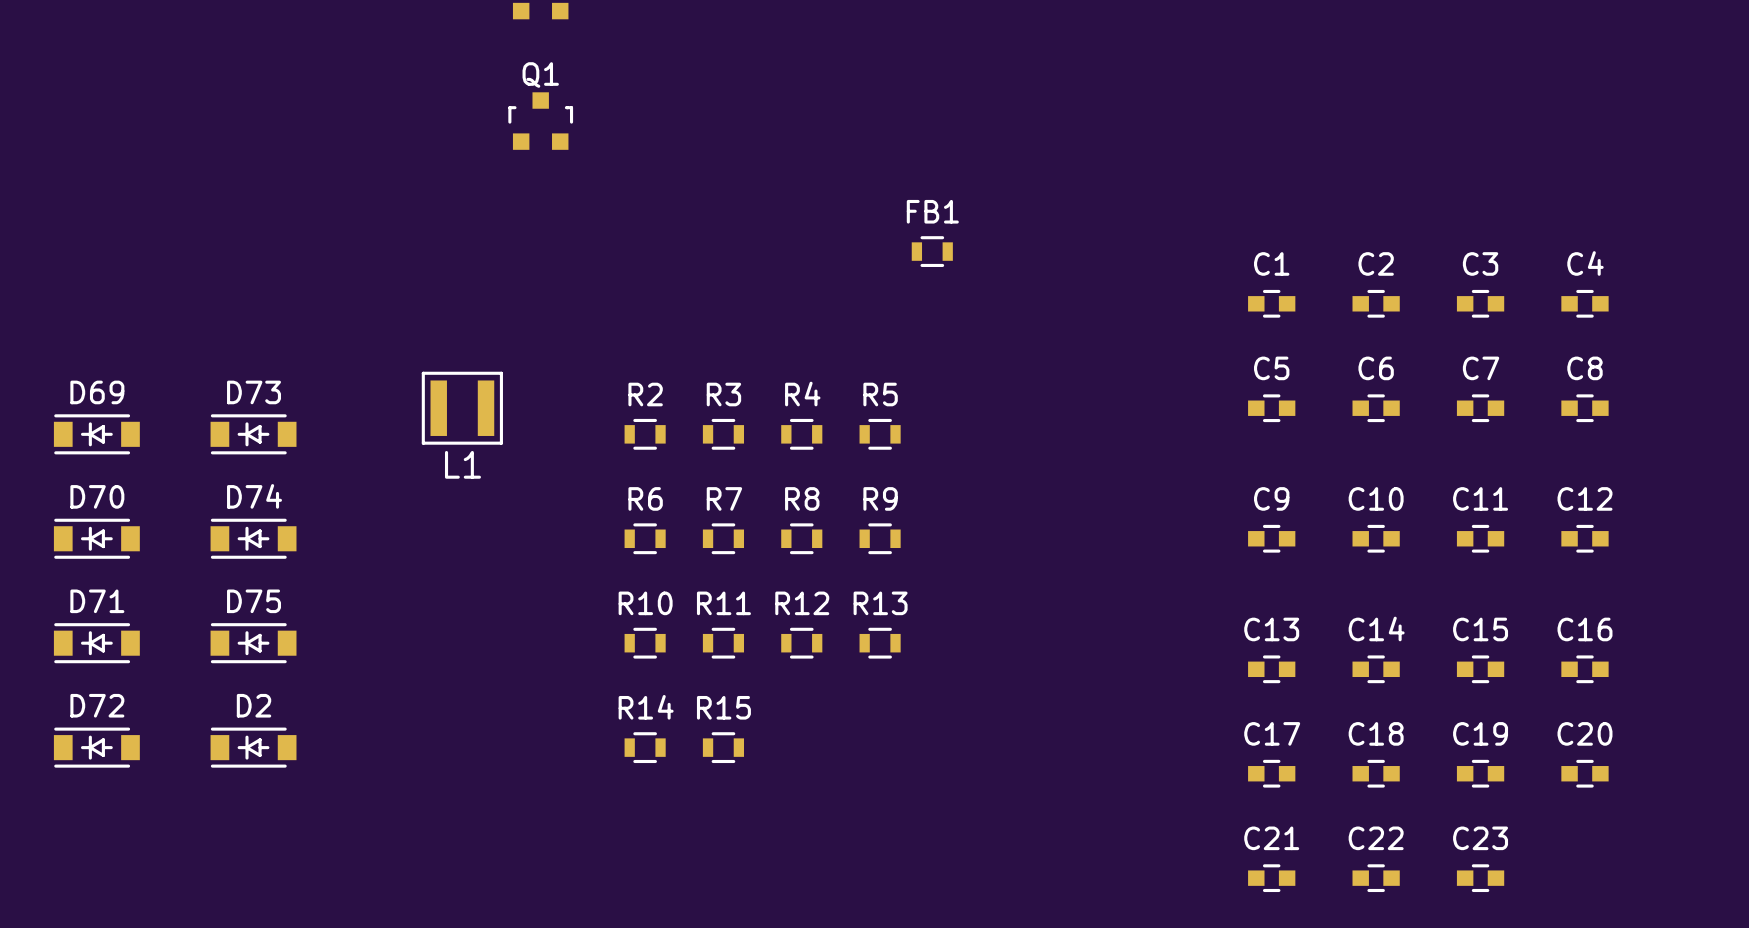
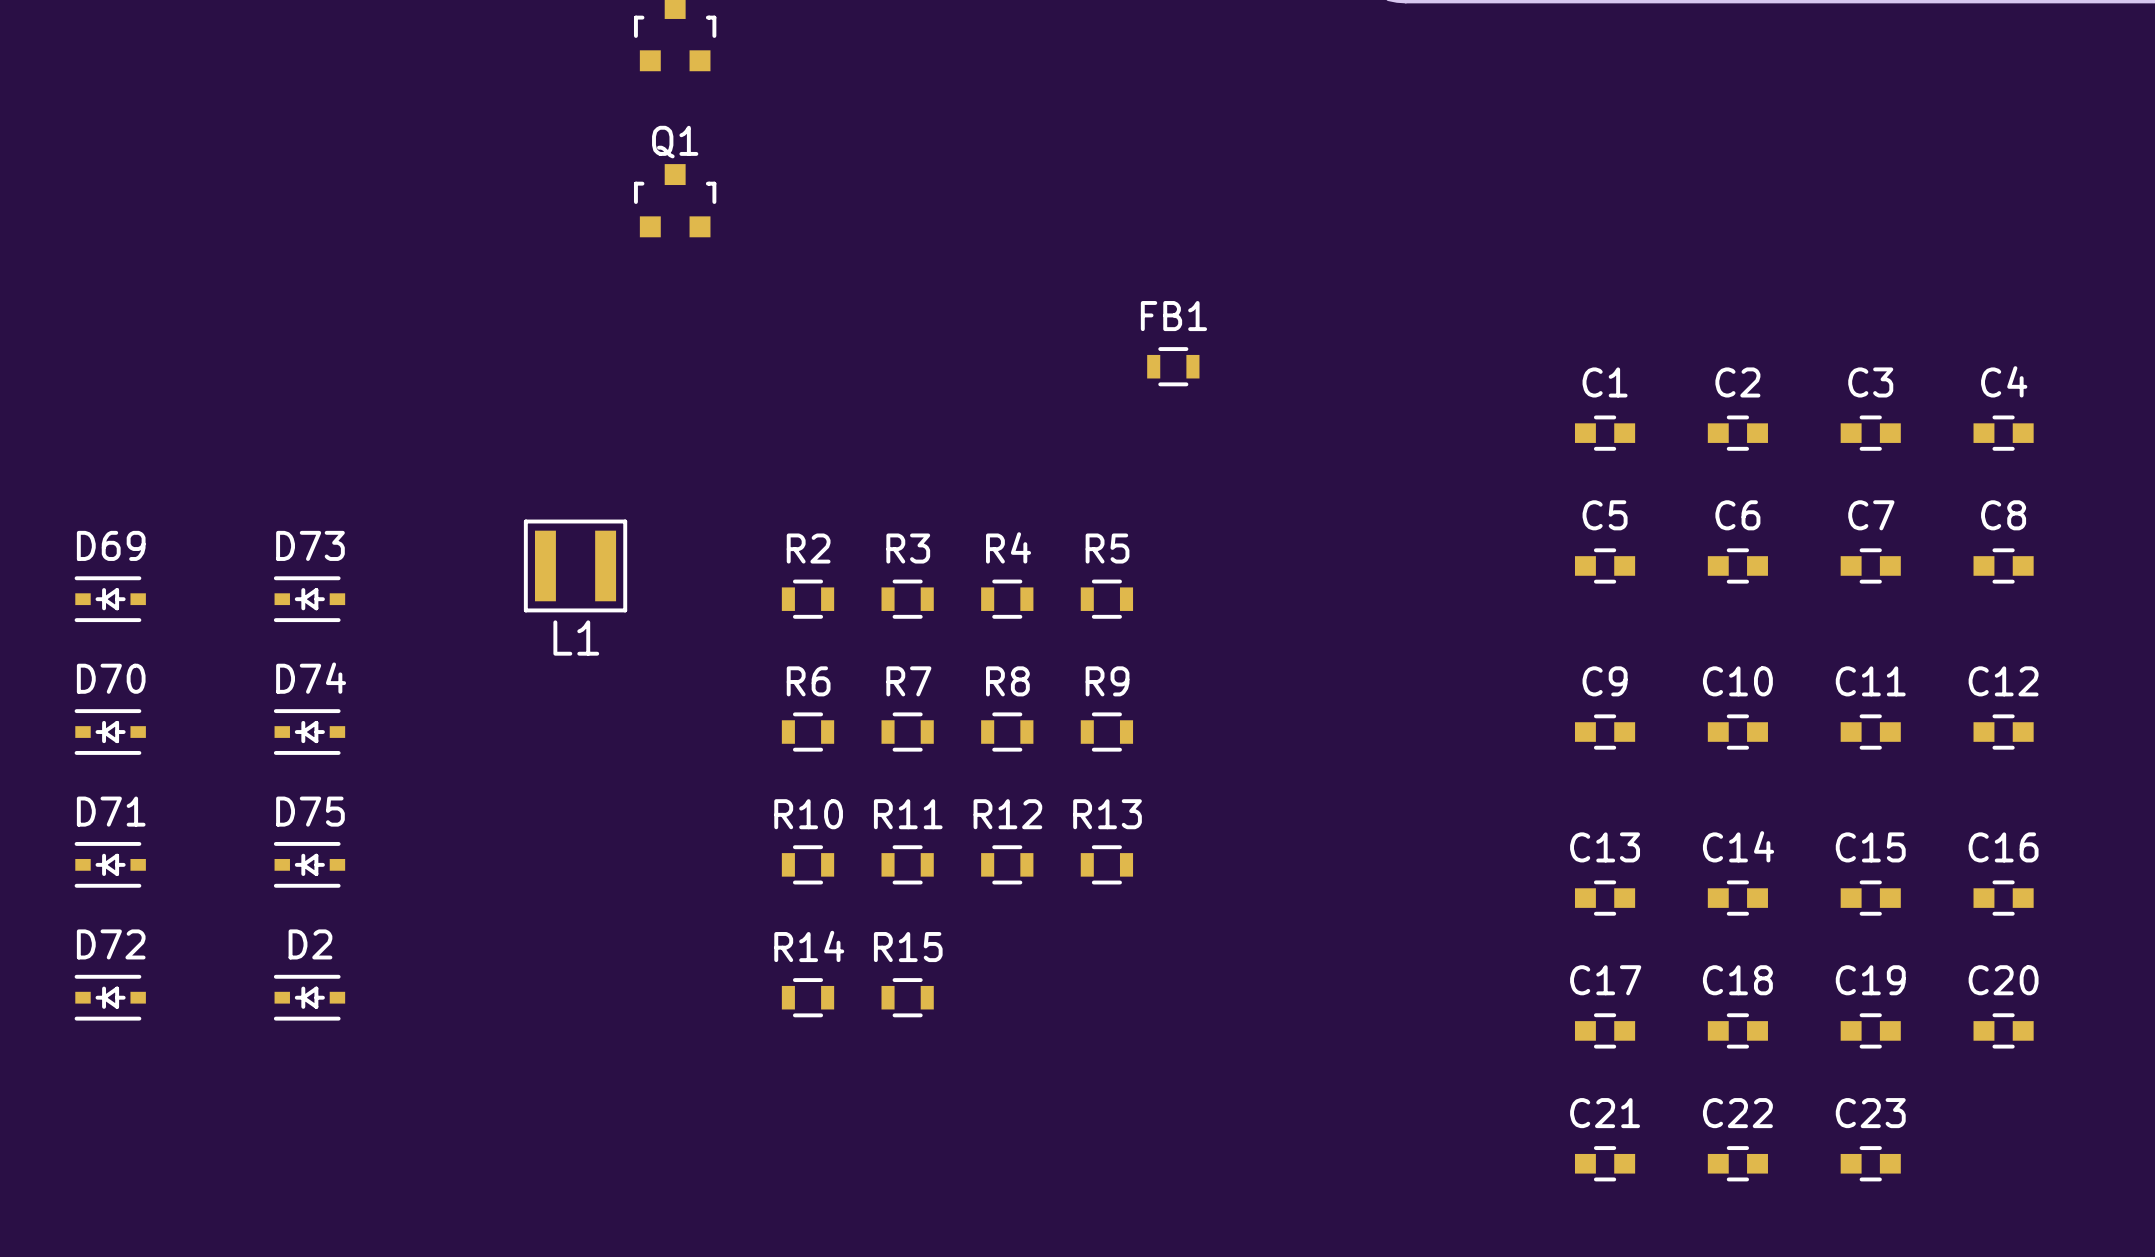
D69 footprint: [53, 414, 140, 455] -> [74, 576, 146, 623]
D73 footprint: [210, 414, 297, 455] -> [273, 576, 346, 623]
D70 footprint: [53, 518, 140, 559] -> [74, 709, 146, 755]
D74 footprint: [210, 518, 297, 559] -> [273, 709, 346, 755]
D71 footprint: [53, 623, 140, 664] -> [74, 841, 146, 888]
D75 footprint: [210, 623, 297, 664] -> [273, 841, 346, 888]
D72 footprint: [53, 727, 140, 768] -> [74, 974, 146, 1021]
D2 footprint: [210, 727, 297, 768] -> [273, 974, 346, 1021]

